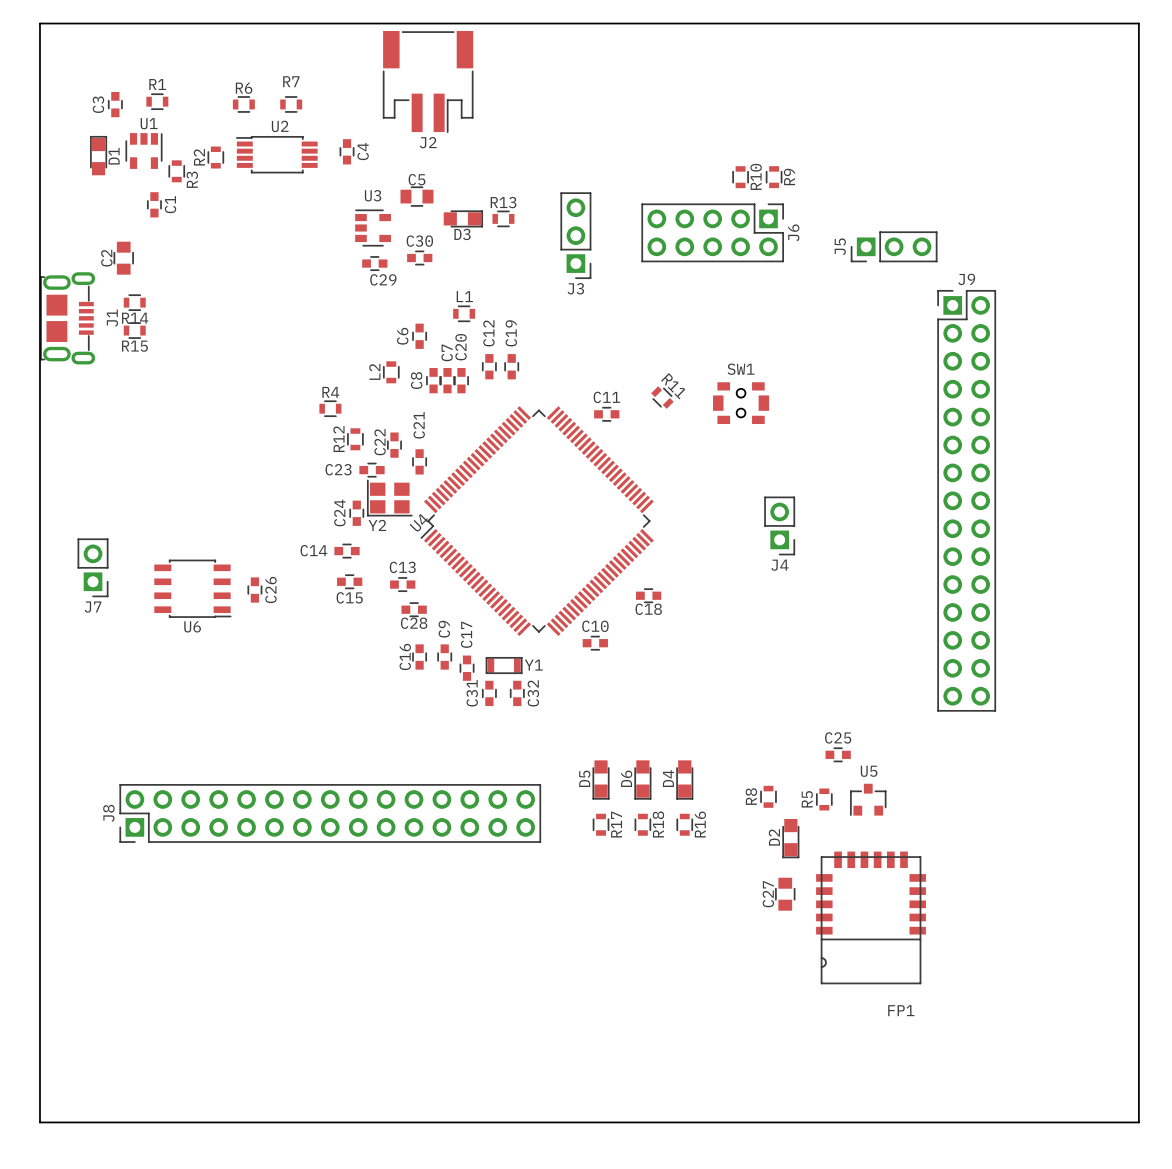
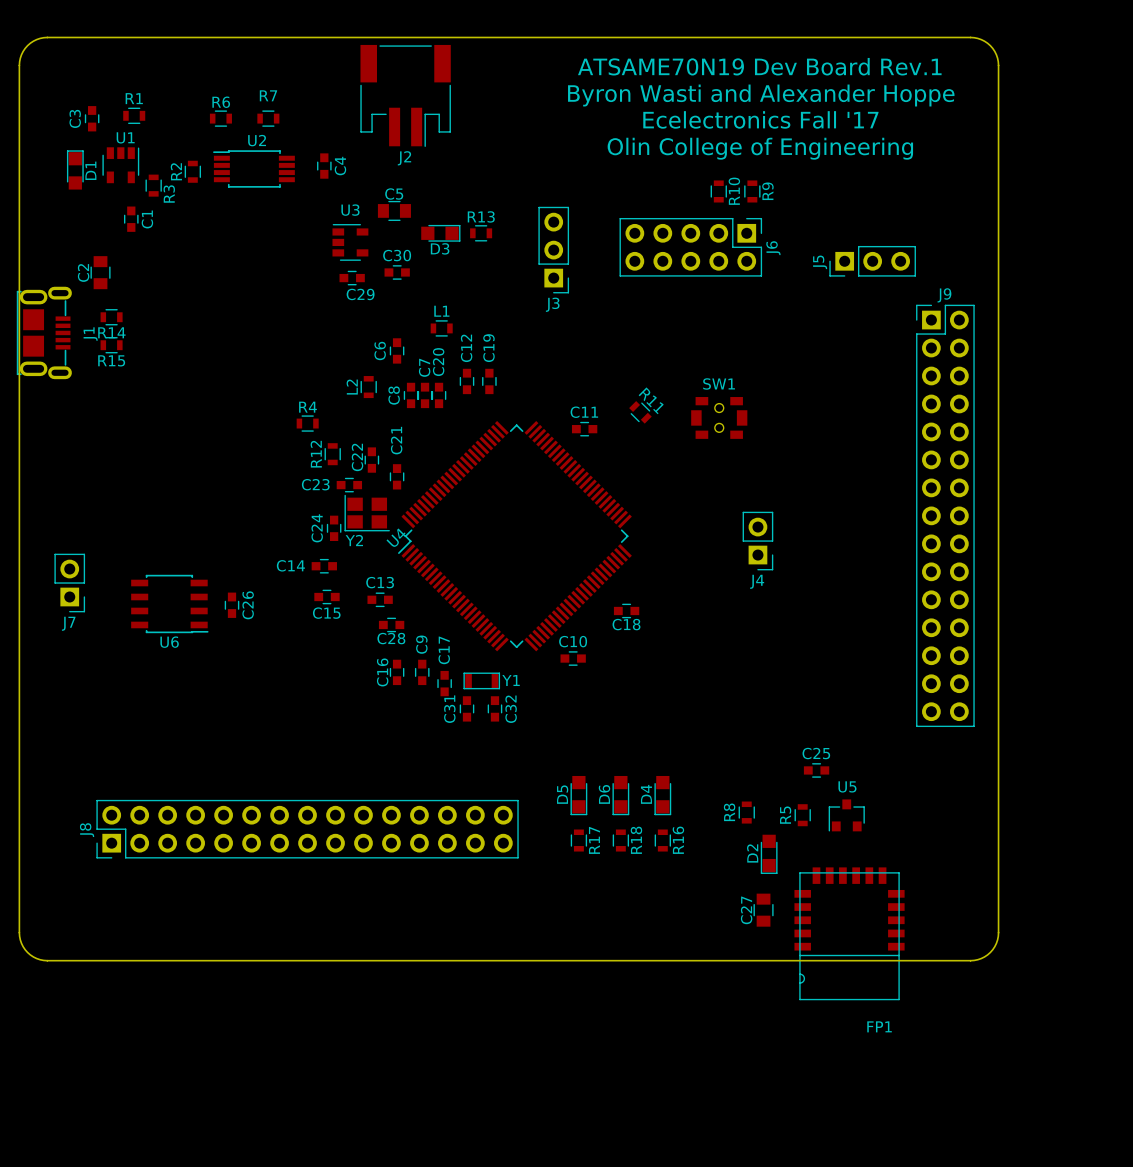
board edge: (70, 23) (39, 23) (39, 1122) (1138, 1122) (1138, 23) (991, 23) -> (47, 37) (36, 39) (27, 45) (21, 54) (19, 65) (19, 932) (21, 943) (27, 952) (36, 958) (47, 960) (970, 960) (981, 958) (990, 952) (996, 943) (998, 932) (998, 65) (996, 54) (990, 45) (981, 39) (970, 37)
text: none -> ATSAME70N19 Dev Board Rev.1 (759, 66)
text: none -> Byron Wasti and Alexander Hoppe (761, 95)
text: none -> Ecelectronics Fall '17 (760, 119)
text: none -> Olin College of Engineering (760, 148)

